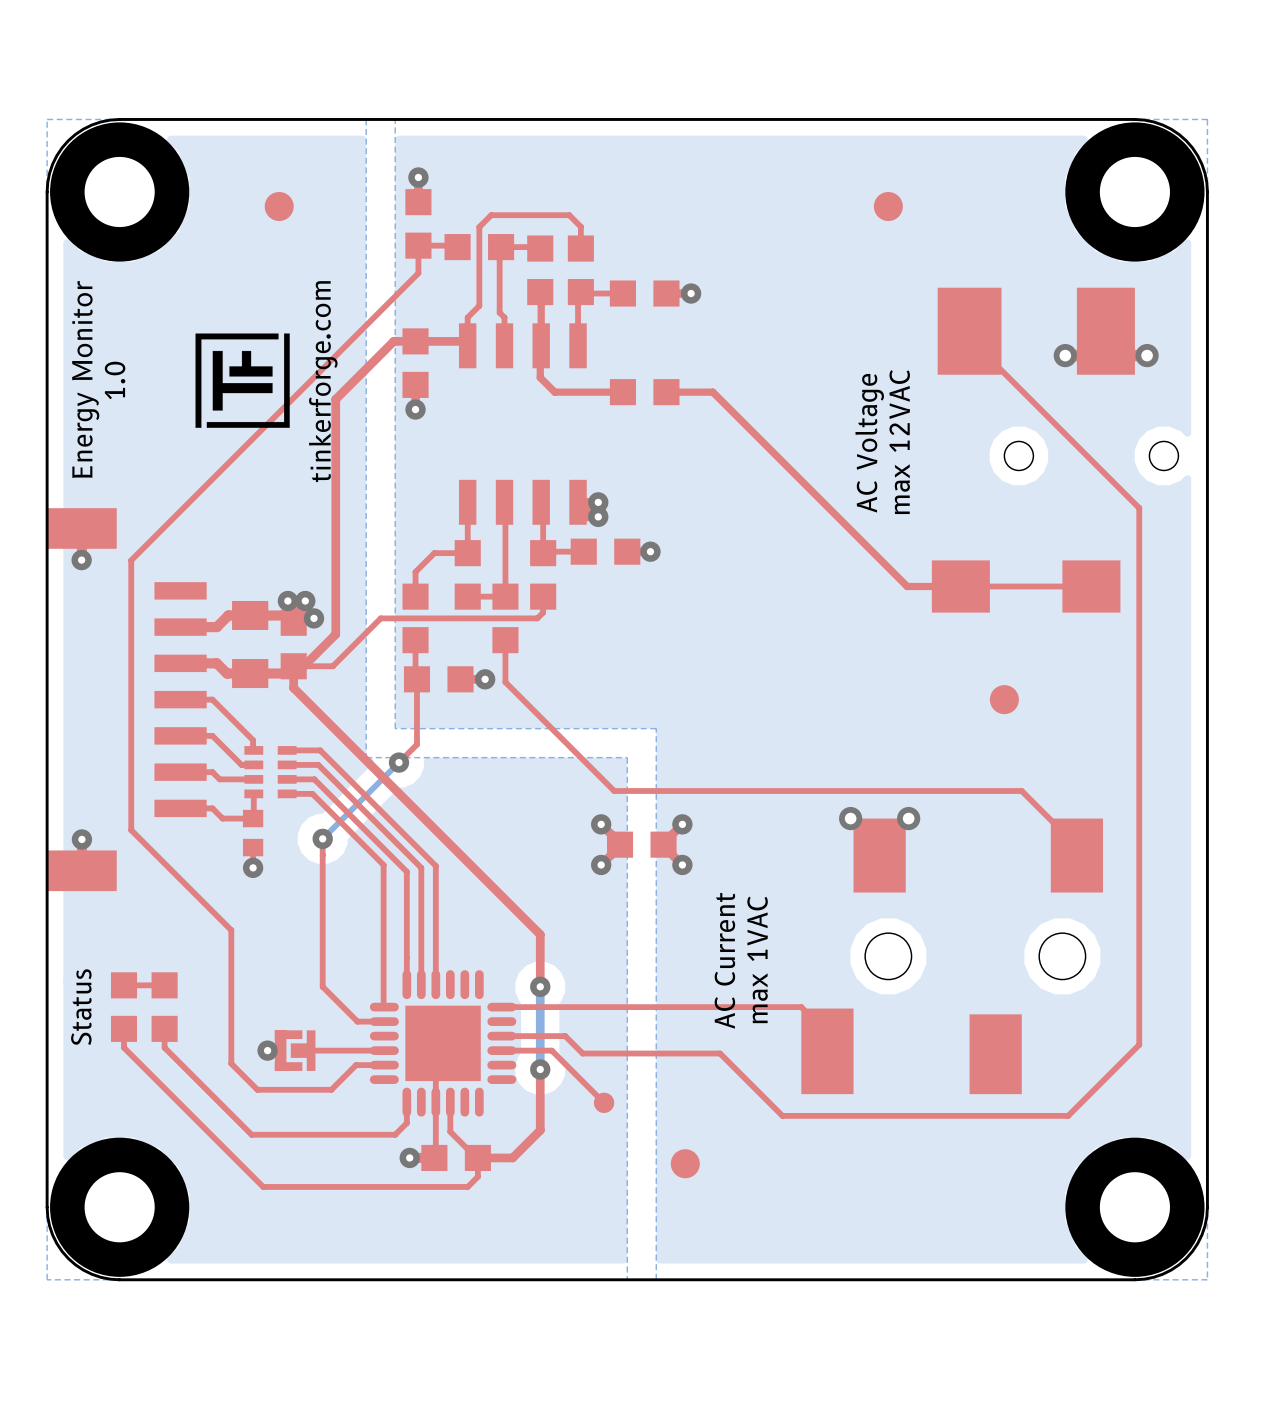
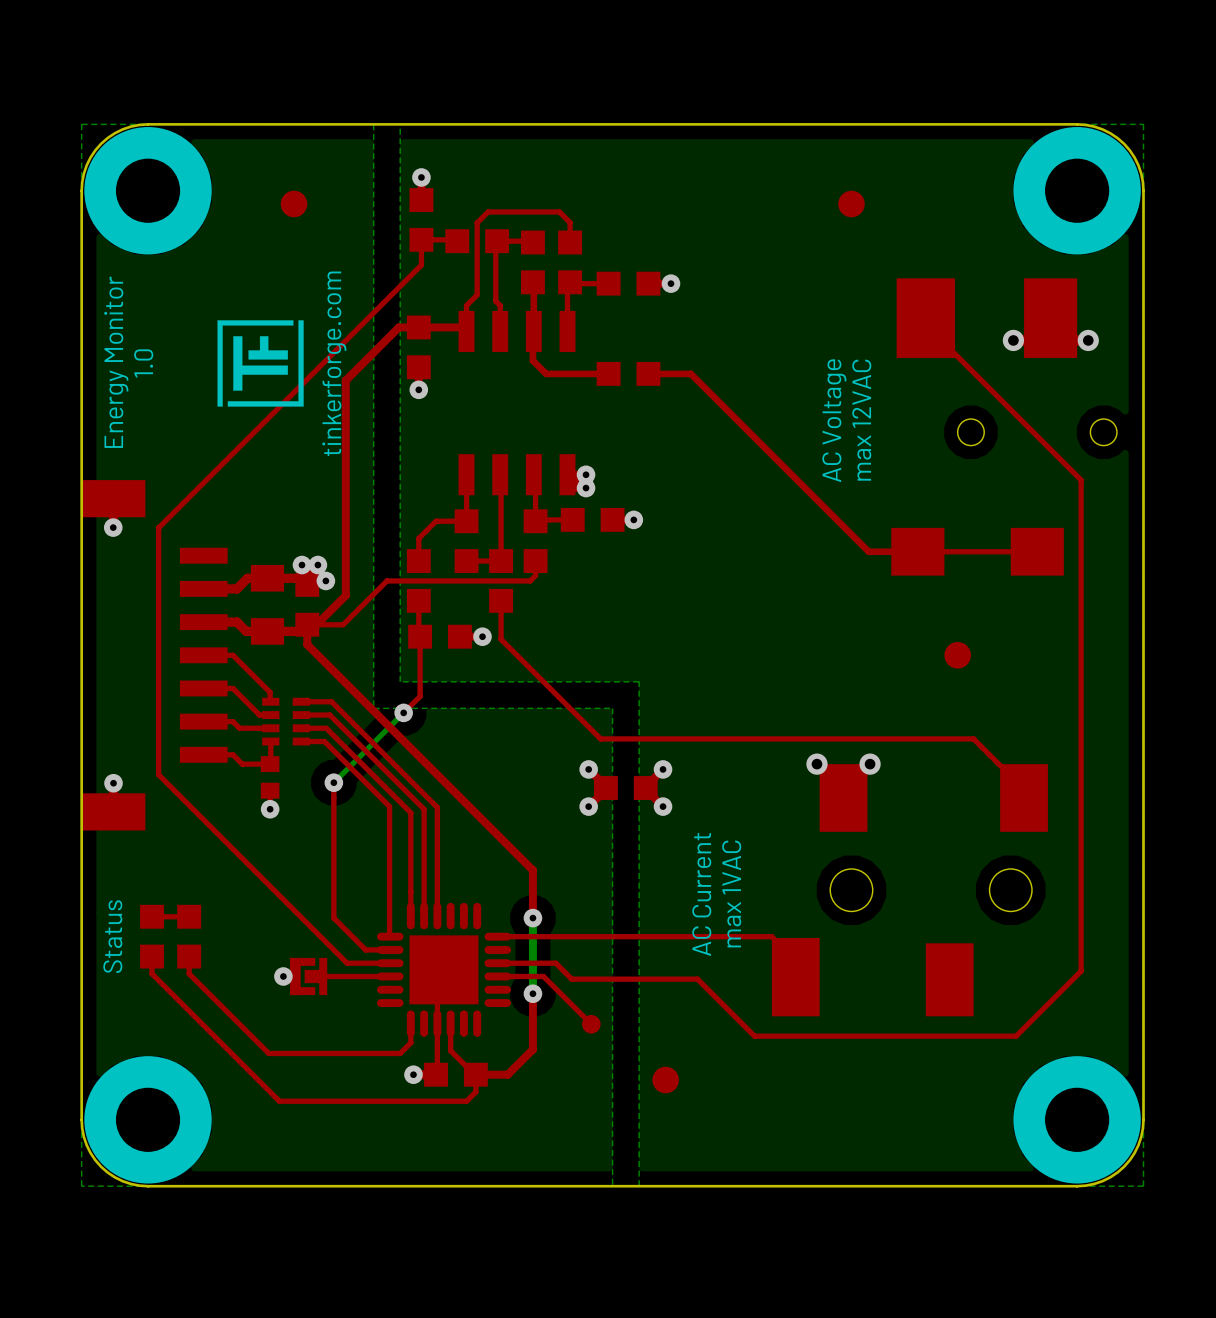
top track: (231, 930) (231, 1063) (257, 1089) (331, 1089) (356, 1065) (384, 1065) -> (250, 866) (347, 963) (392, 963)

